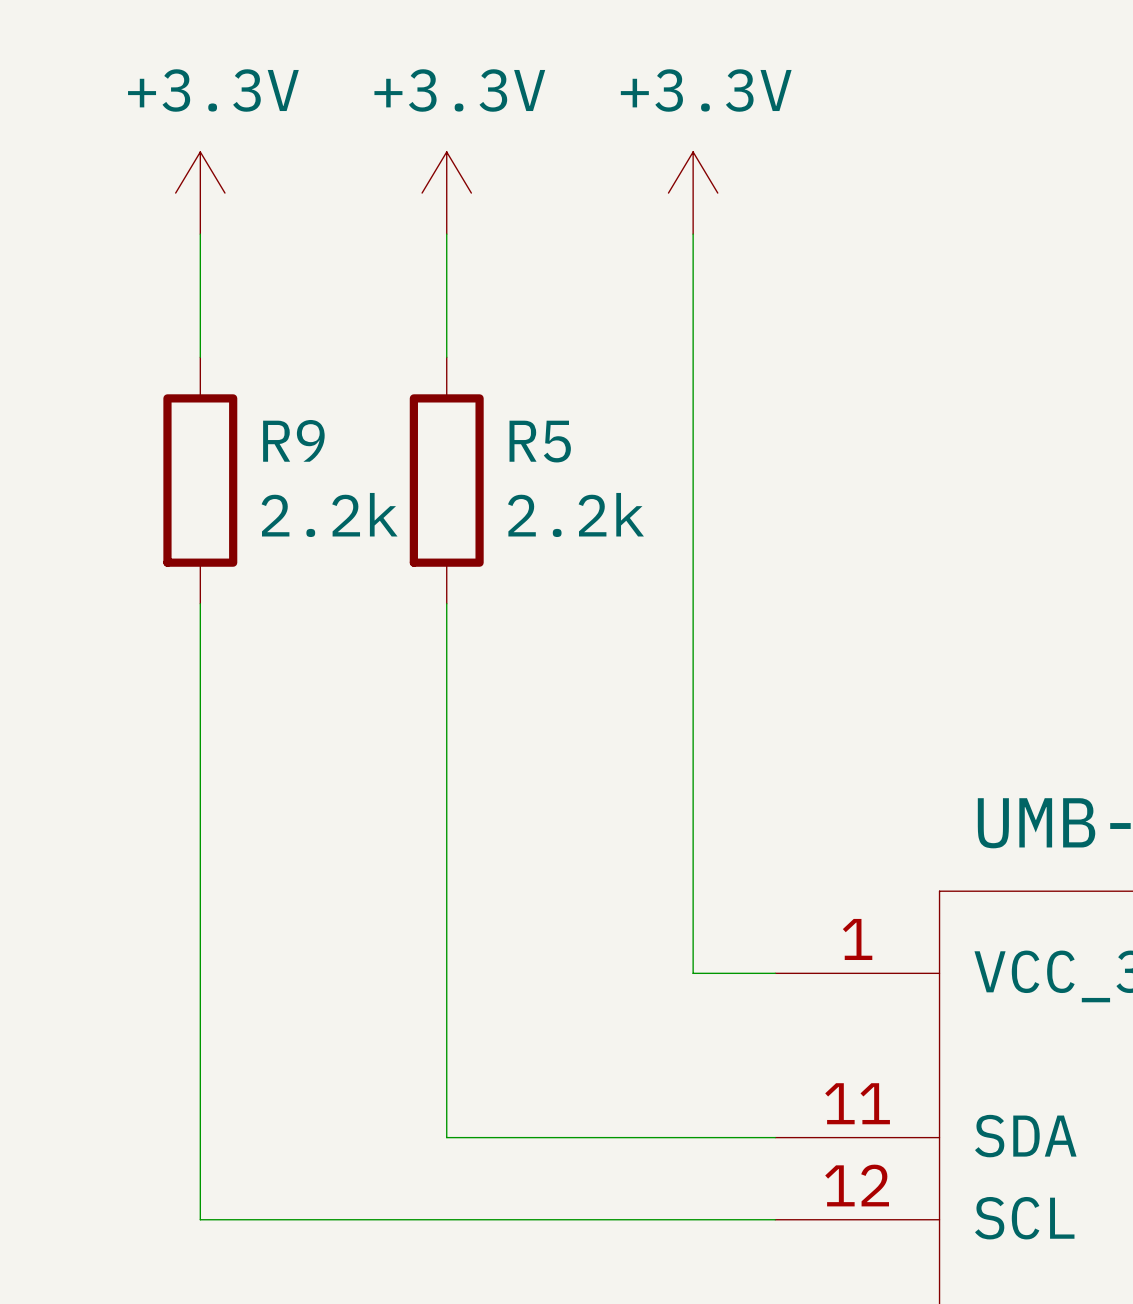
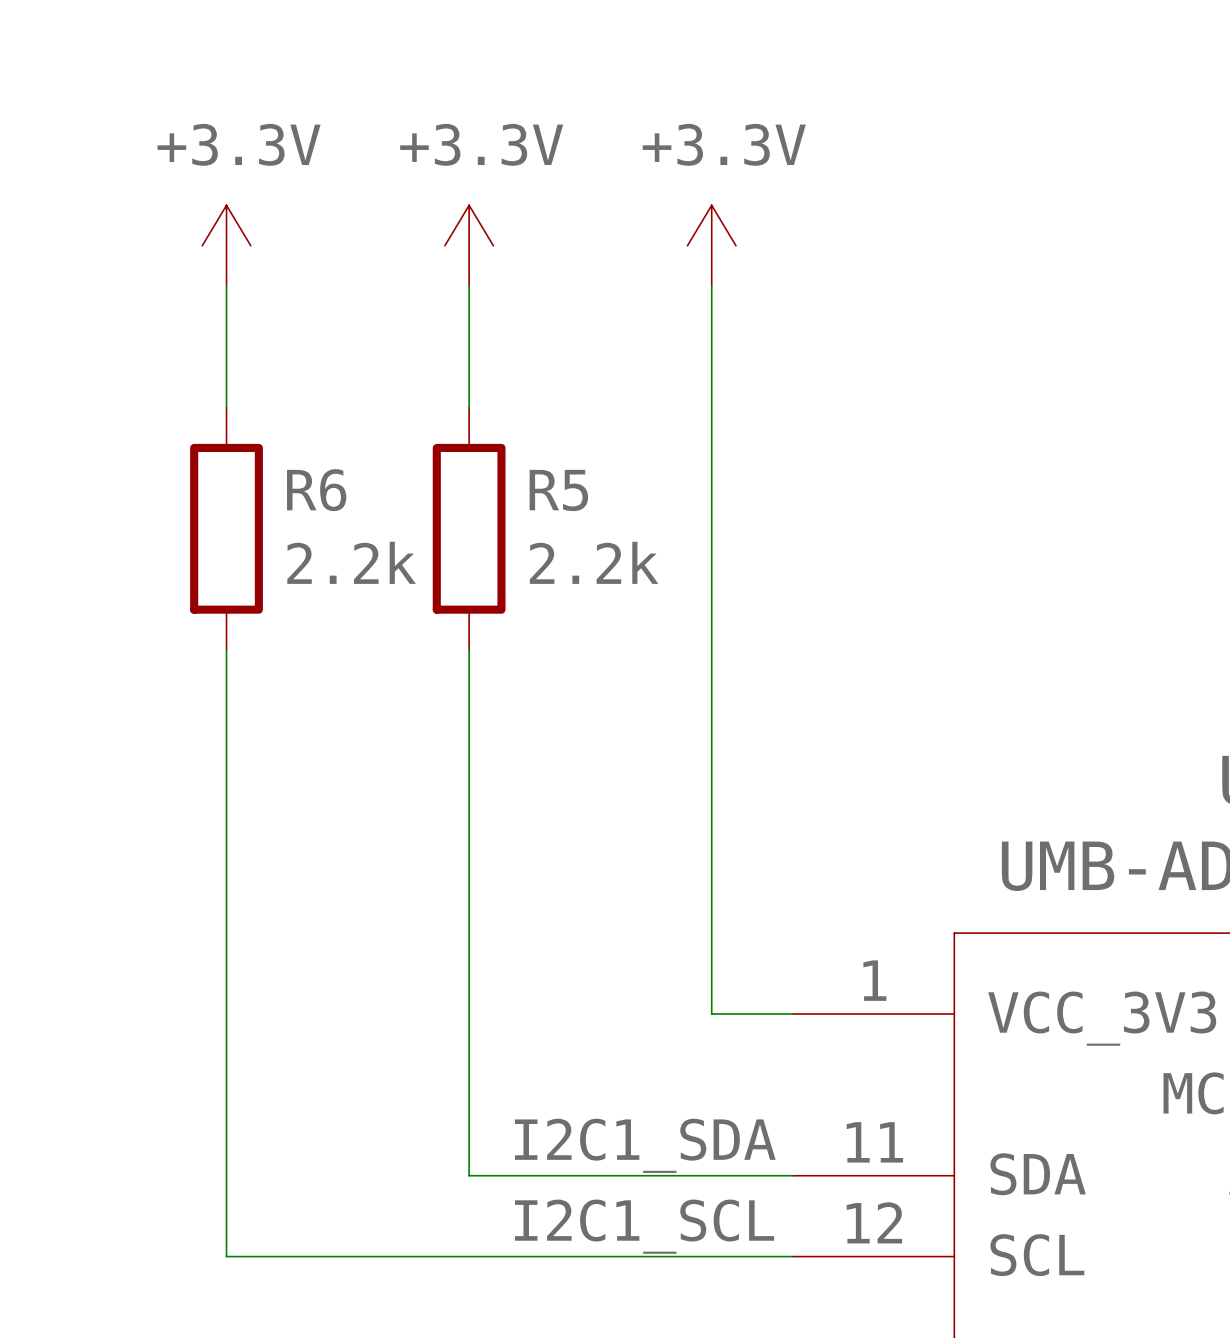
R9 name: R9 (293, 440) -> R6 (316, 490)
label: none -> I2C1_SDA (645, 1145)
label: none -> I2C1_SCL (644, 1226)

